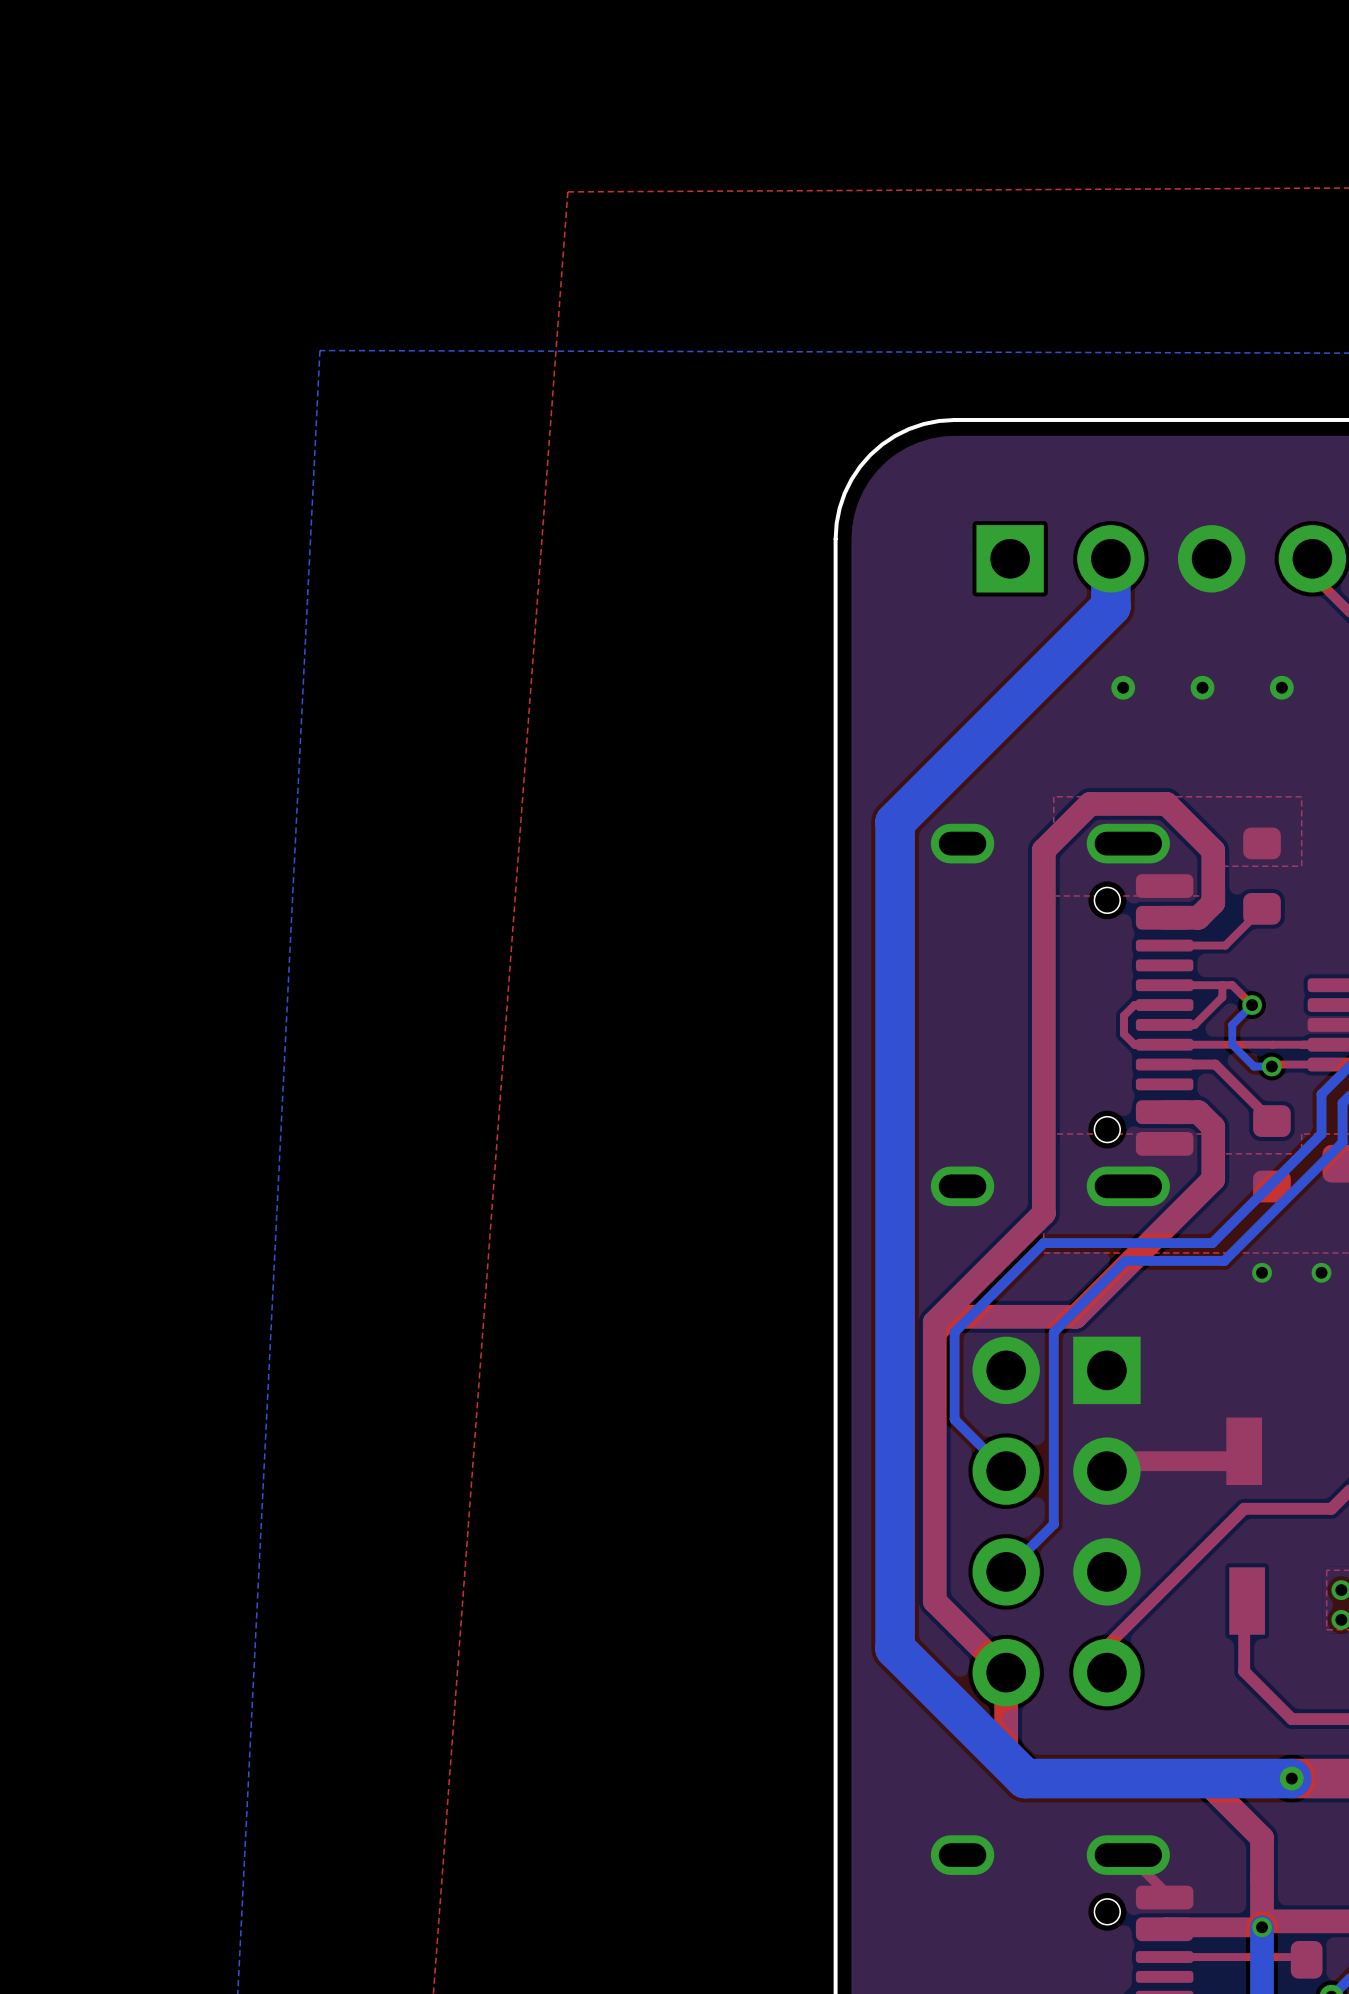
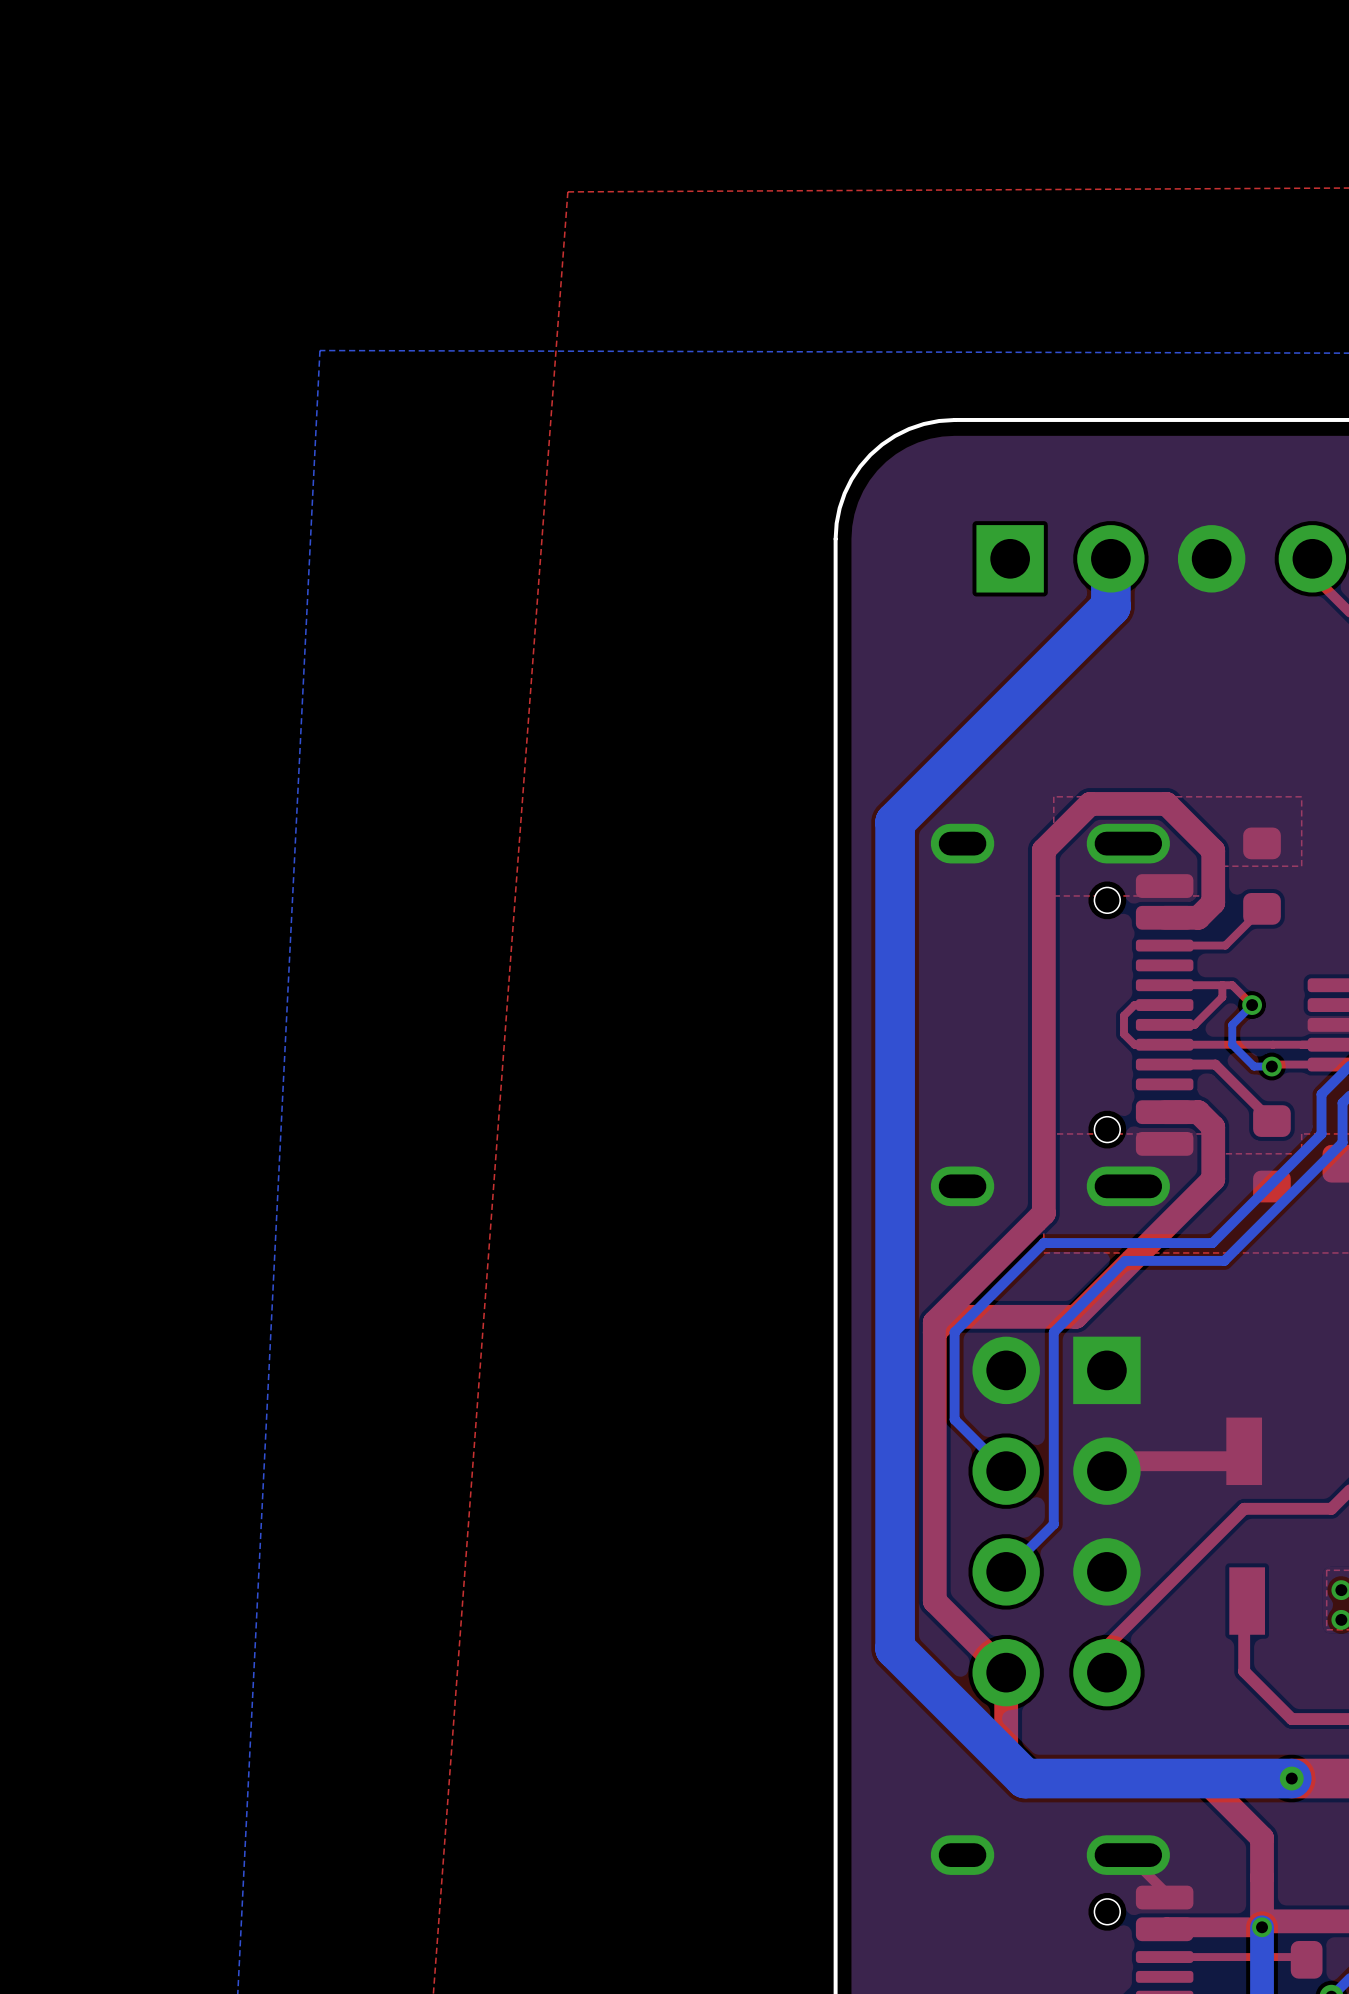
via: (1123, 687) -> none
via: (1202, 687) -> none
via: (1281, 687) -> none
via: (1262, 1272) -> none
via: (1321, 1272) -> none

